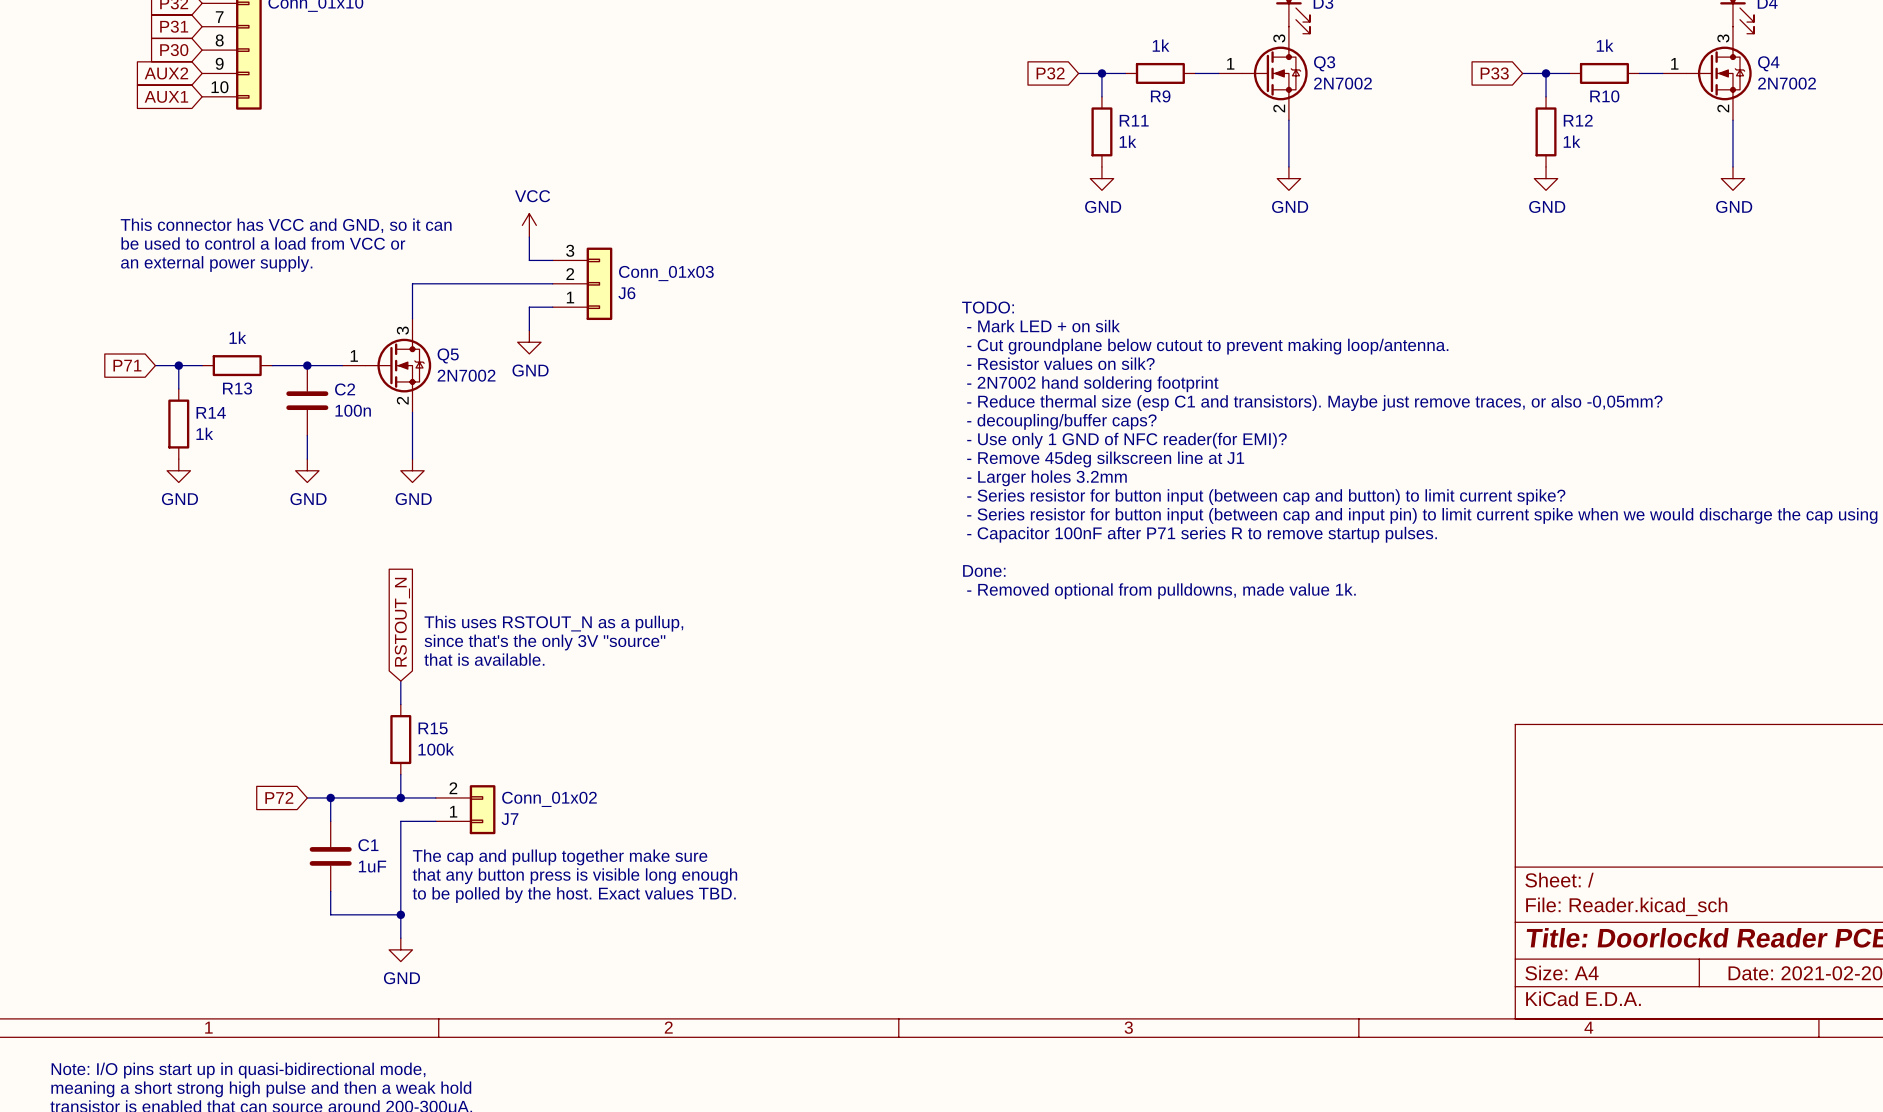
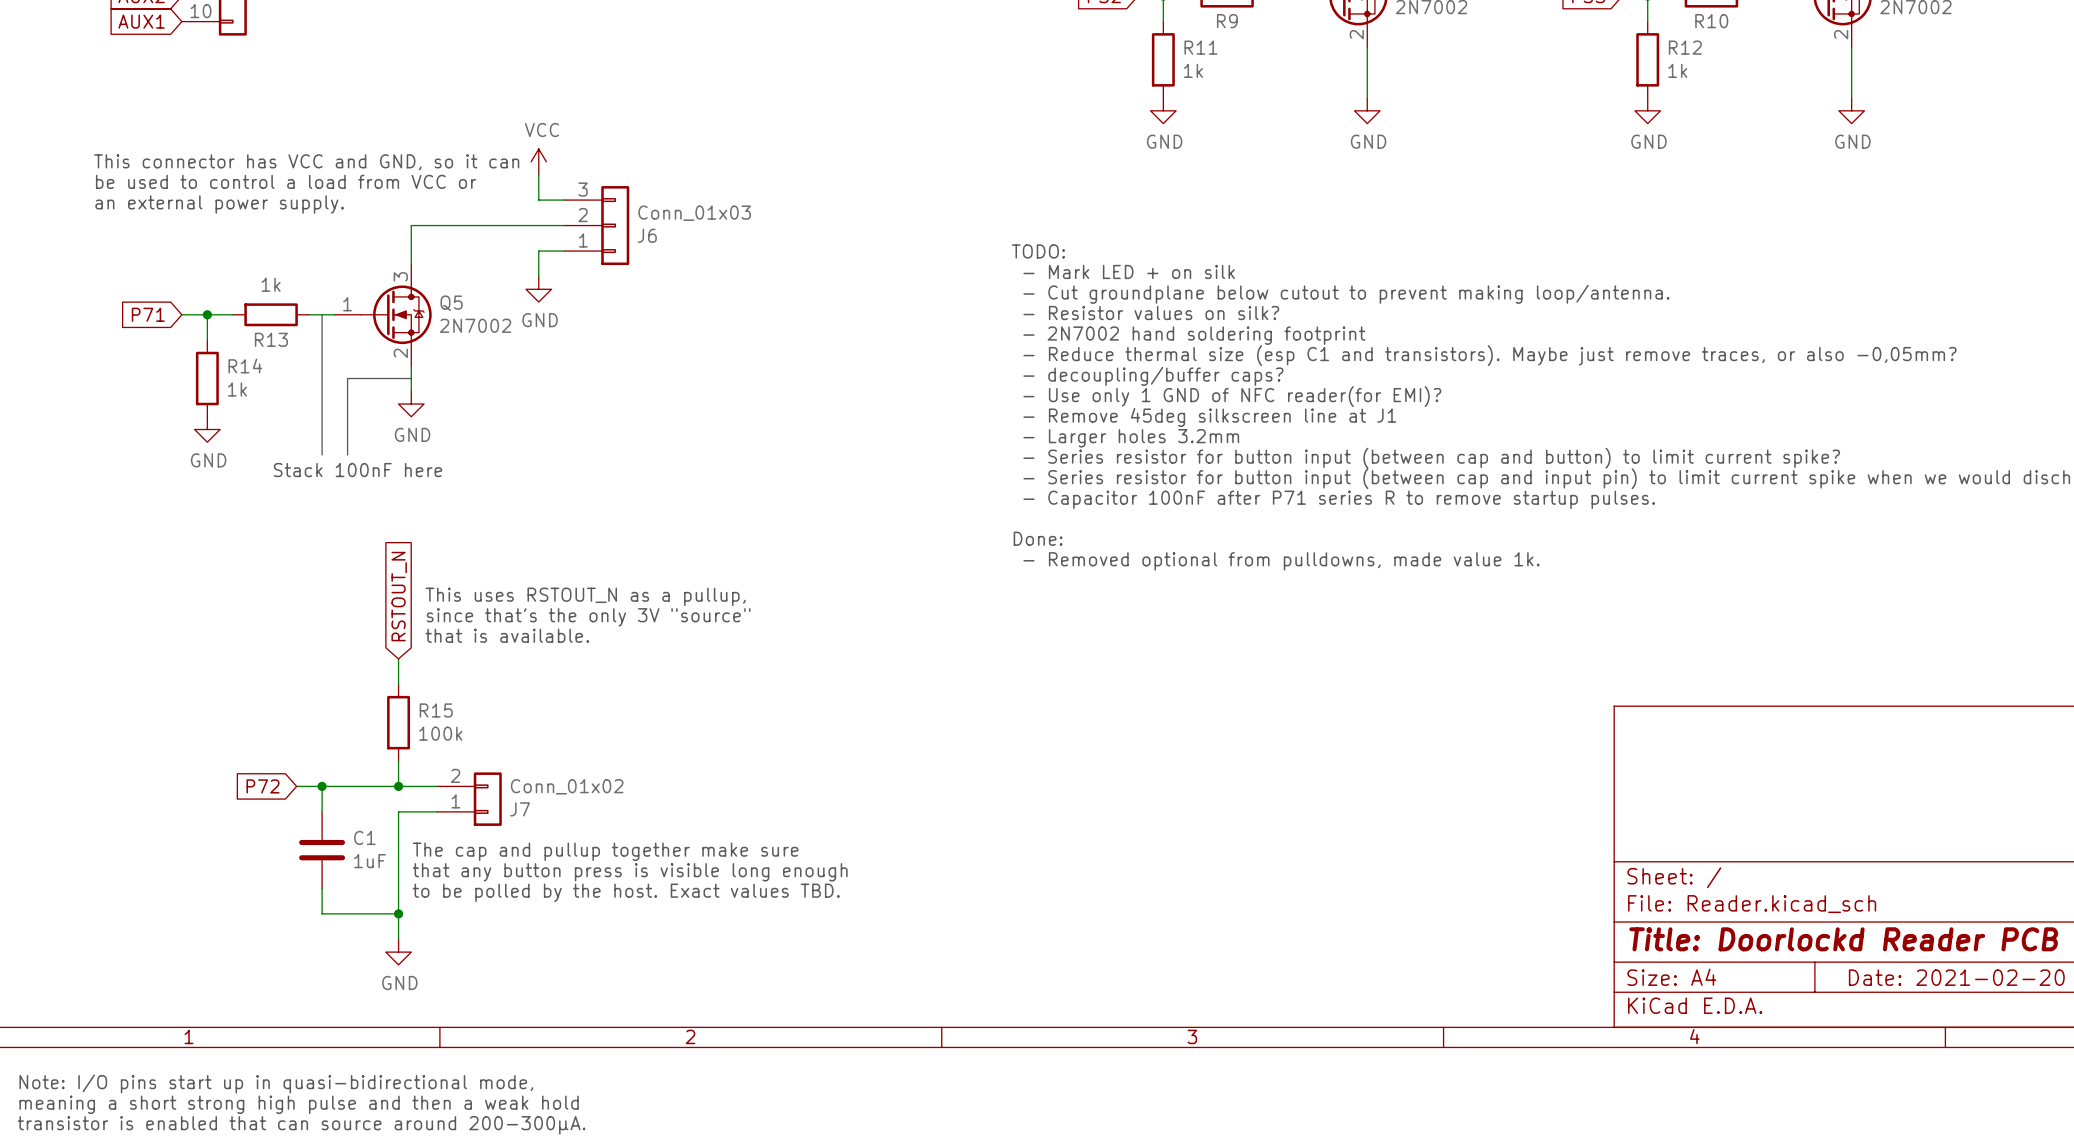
global label position: P71 (127, 365) -> P71 (148, 314)
wire: (155, 365) (202, 365) -> (232, 314) (181, 314)
wire: (178, 365) (178, 388) -> (207, 314) (207, 340)
junction: (178, 365) -> none
junction: none -> (207, 314)
R13 position: (237, 365) -> (271, 314)
wire: (272, 365) (319, 365) -> none
junction: (307, 365) -> none
line: none -> (322, 314) (322, 454)
C2: 100n (307, 400) -> none
R14 position: (178, 424) -> (207, 378)
line: none -> (411, 378) (347, 378) (347, 454)
wire: (307, 435) (307, 459) -> none
power symbol: GND (178, 470) -> none
power symbol: none -> GND (207, 429)
power symbol: GND (307, 470) -> none
power symbol position: GND (412, 470) -> GND (411, 404)
text: none -> Stack 100nF here (357, 470)

